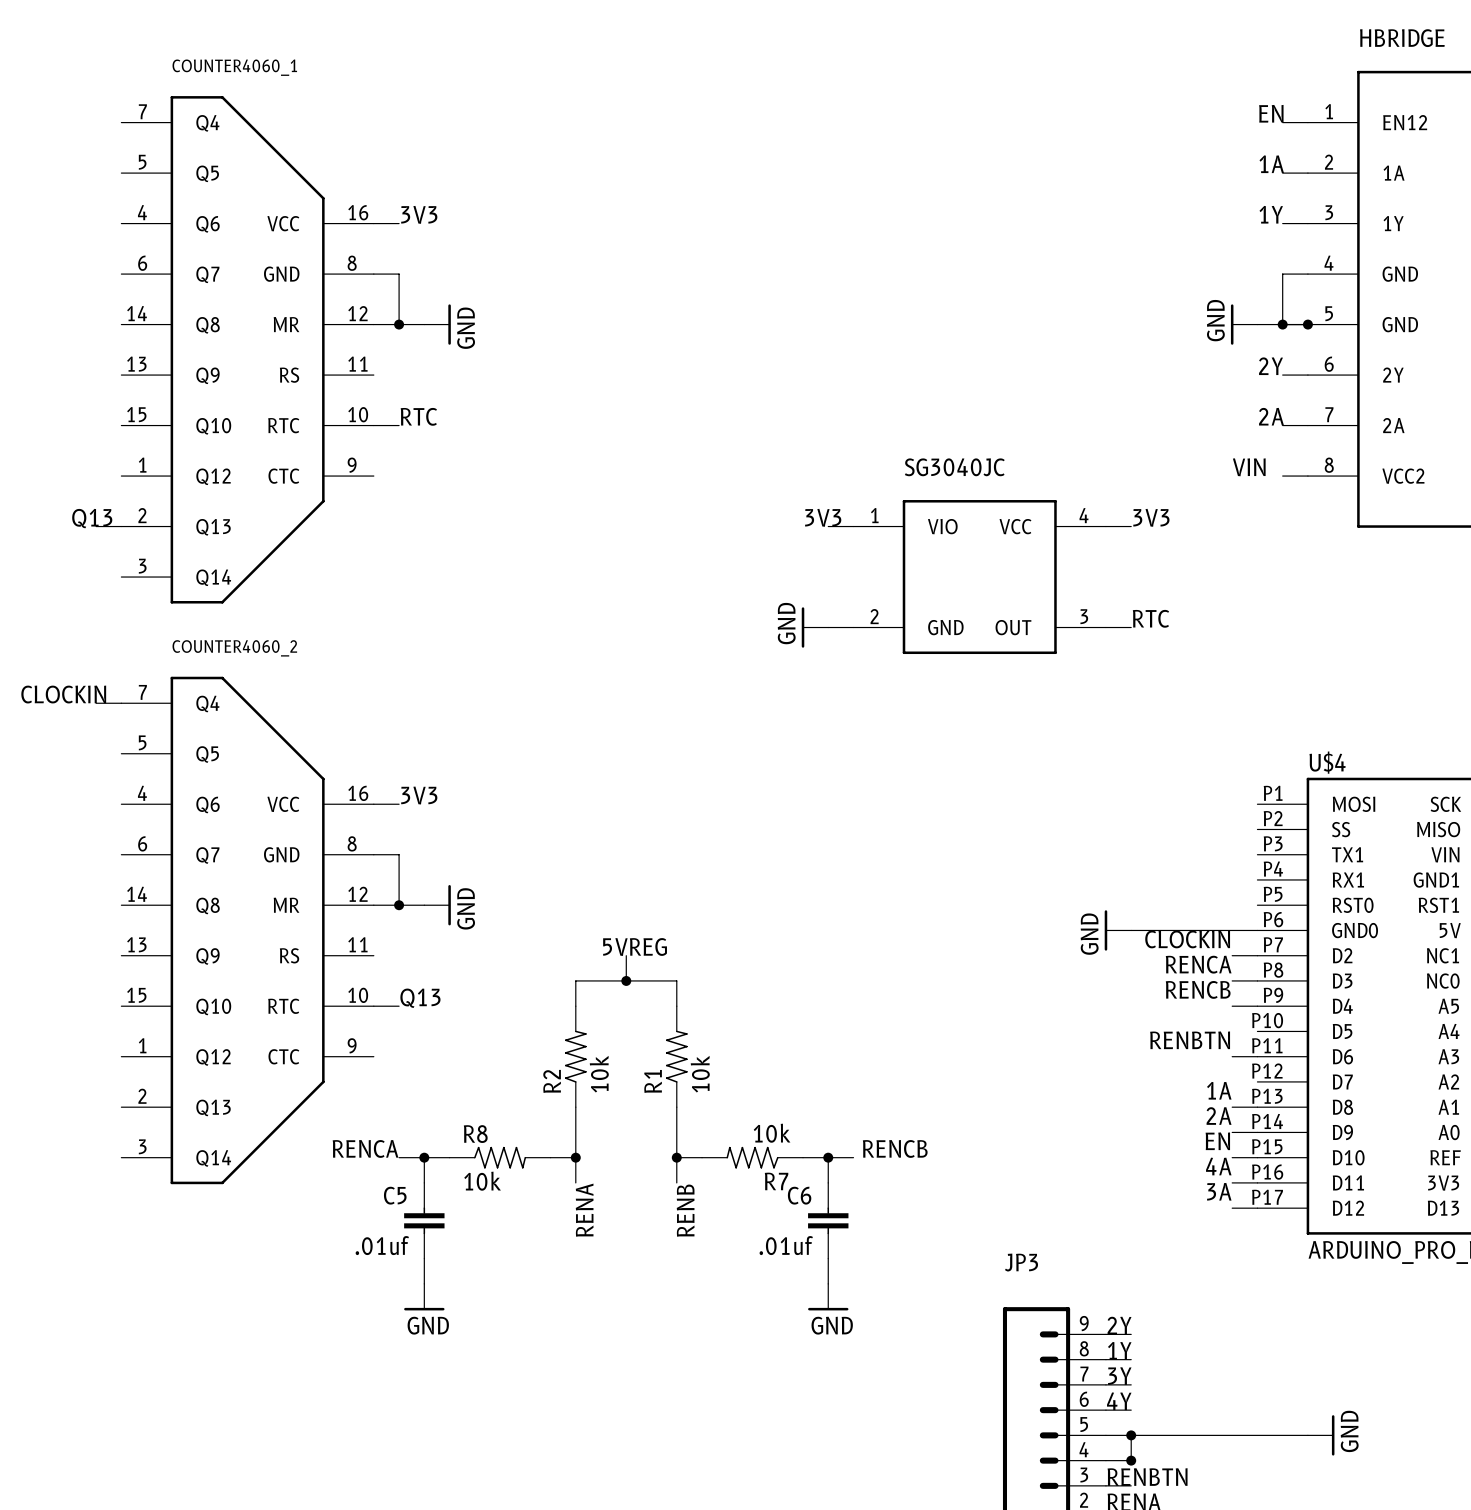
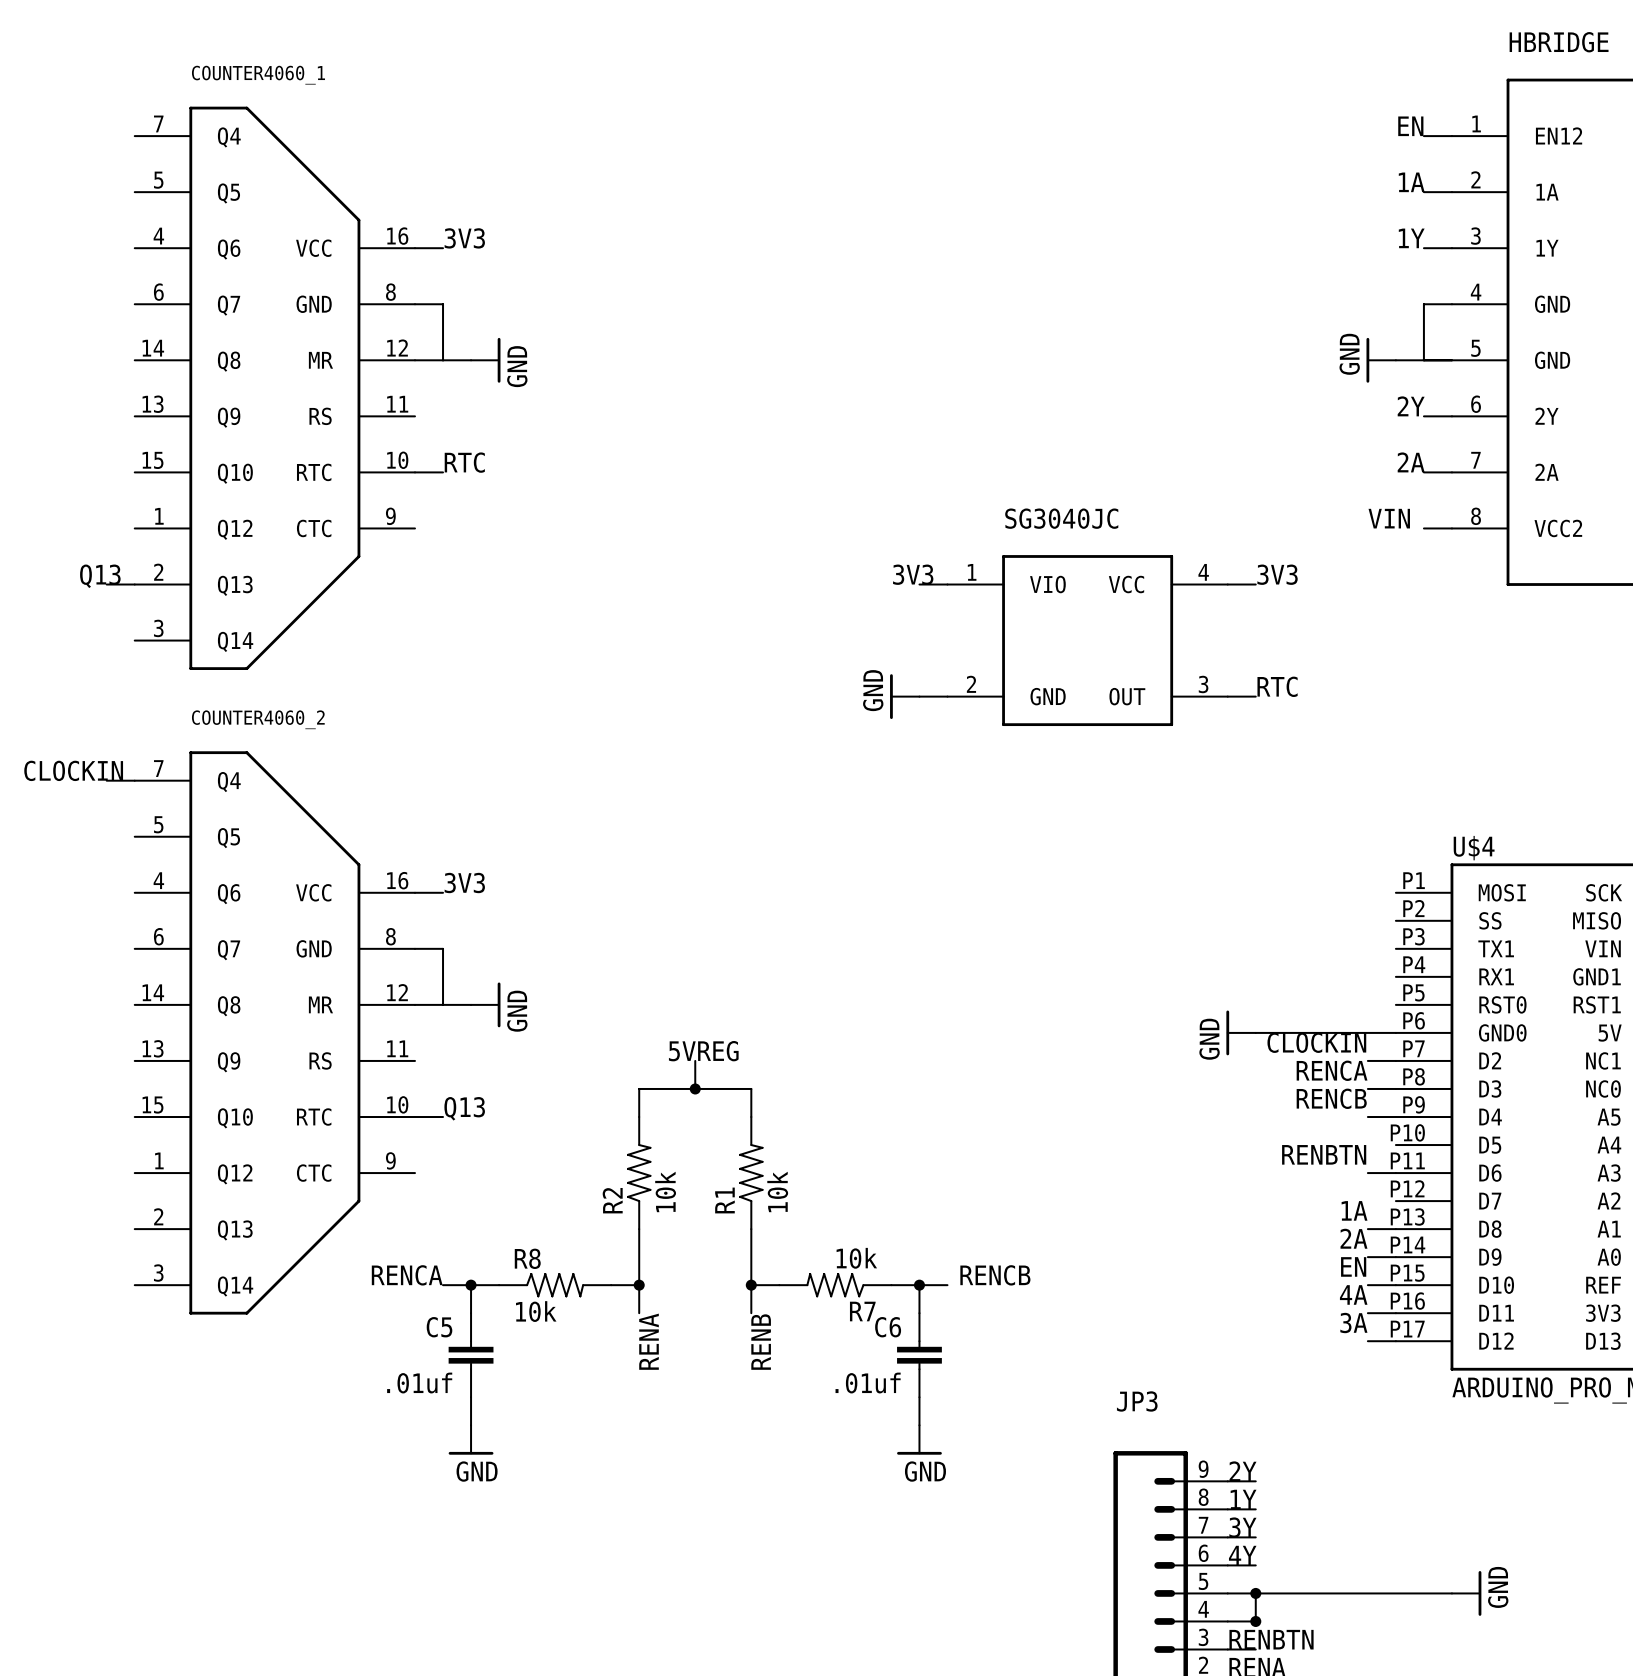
junction: (399, 324) -> none
junction: (1282, 324) -> none
junction: (1307, 324) -> none
junction: (399, 905) -> none

